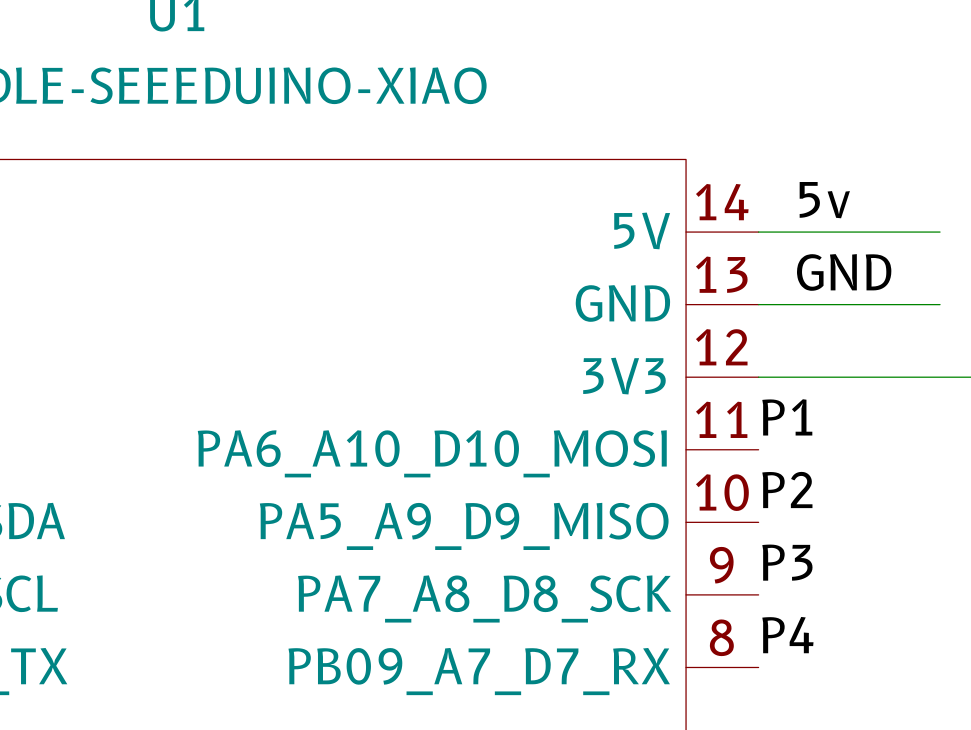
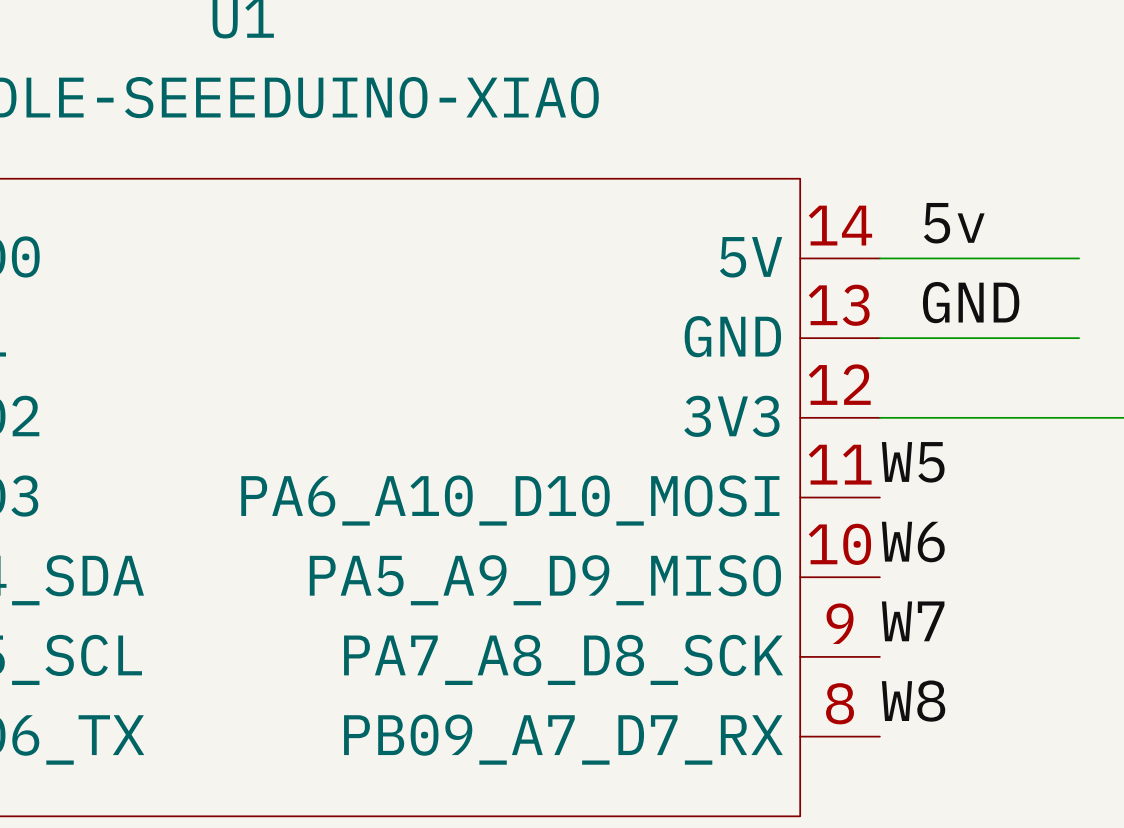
label: P1 (787, 417) -> W5 (913, 462)
label: P2 (787, 489) -> W6 (913, 542)
label: P3 (787, 562) -> W7 (913, 621)
label: P4 (787, 635) -> W8 (913, 701)

